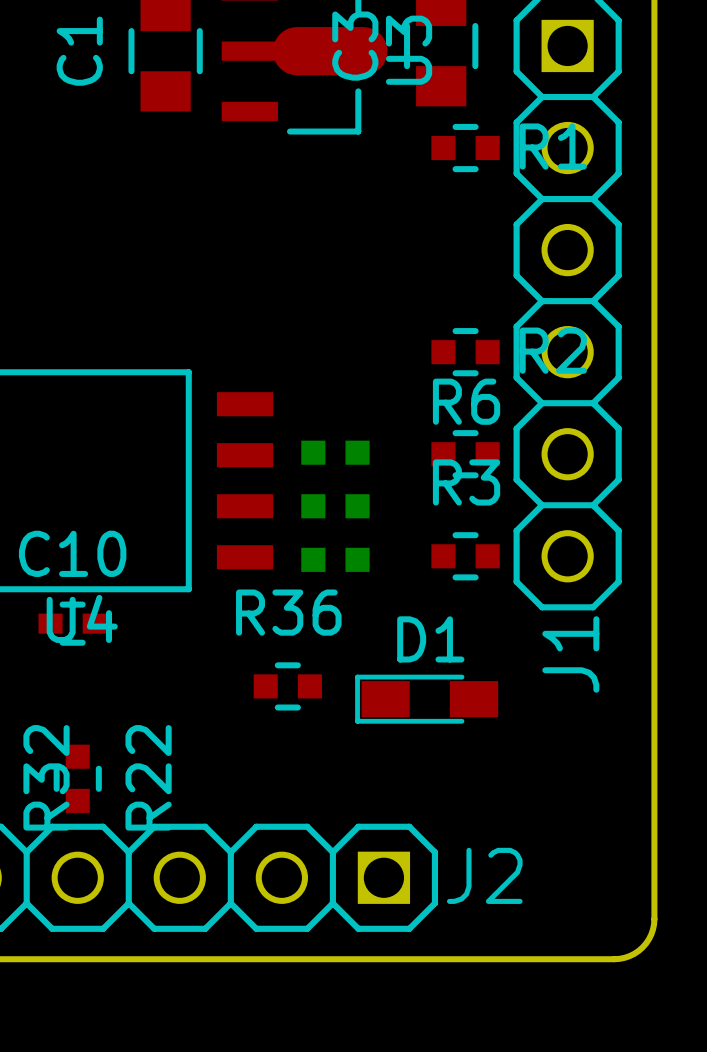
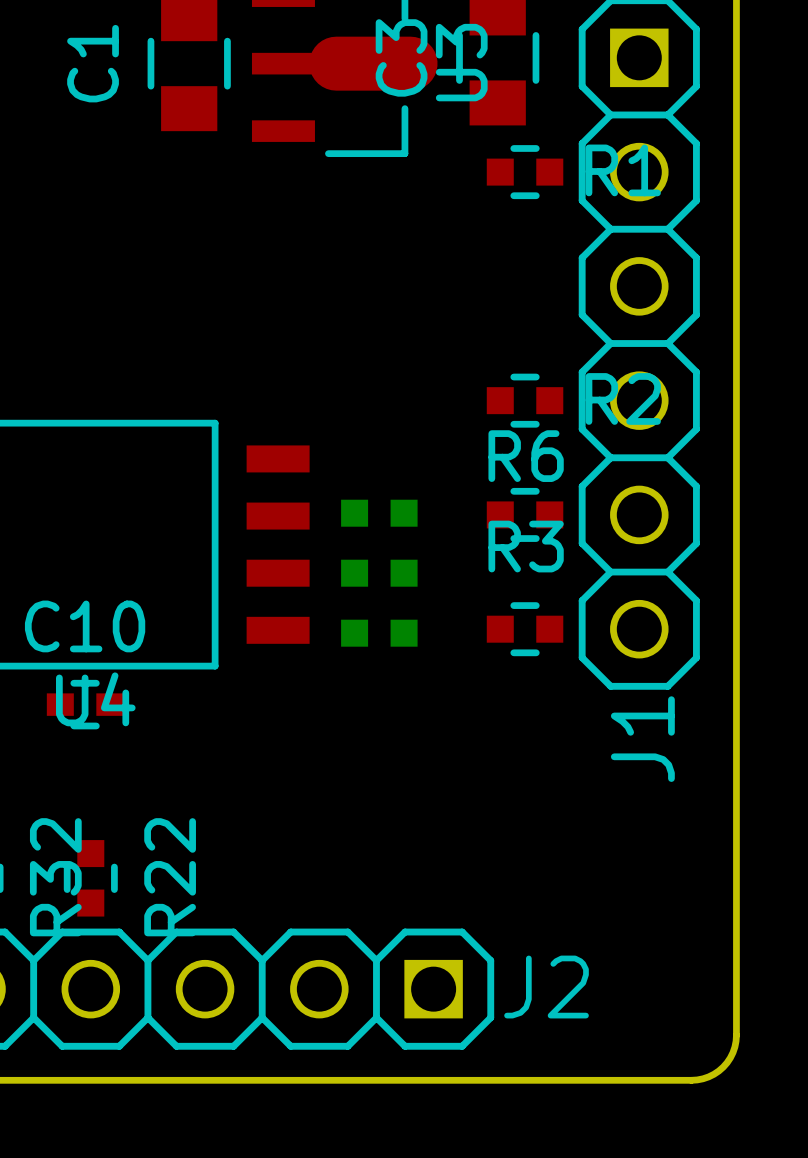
R36: (287, 686) -> none
D1: (426, 699) -> none

